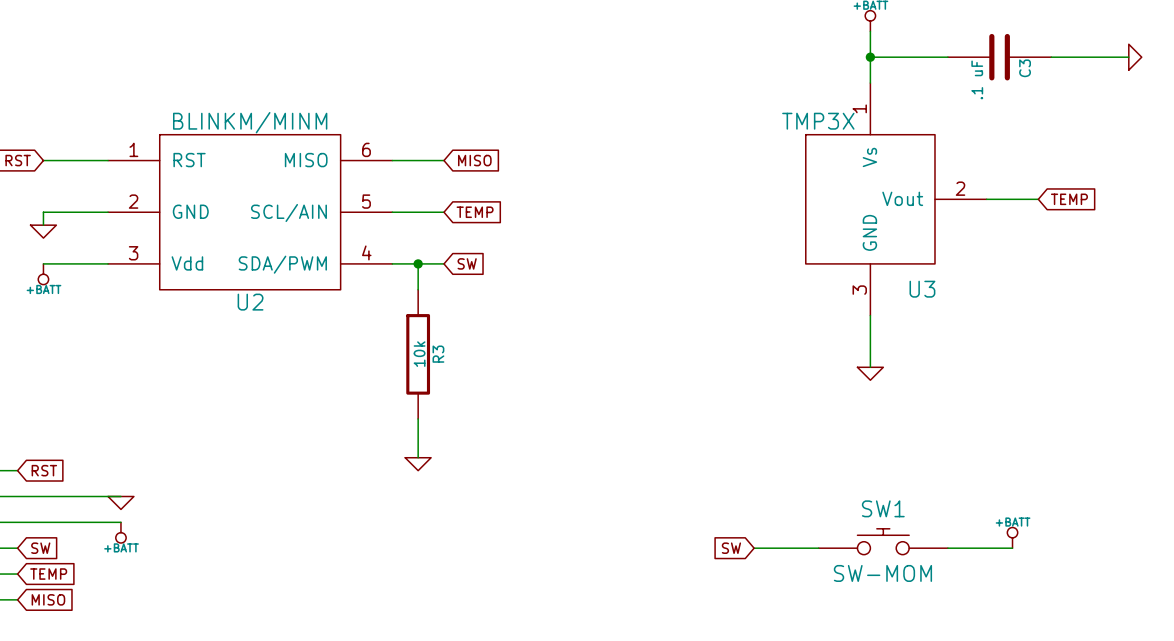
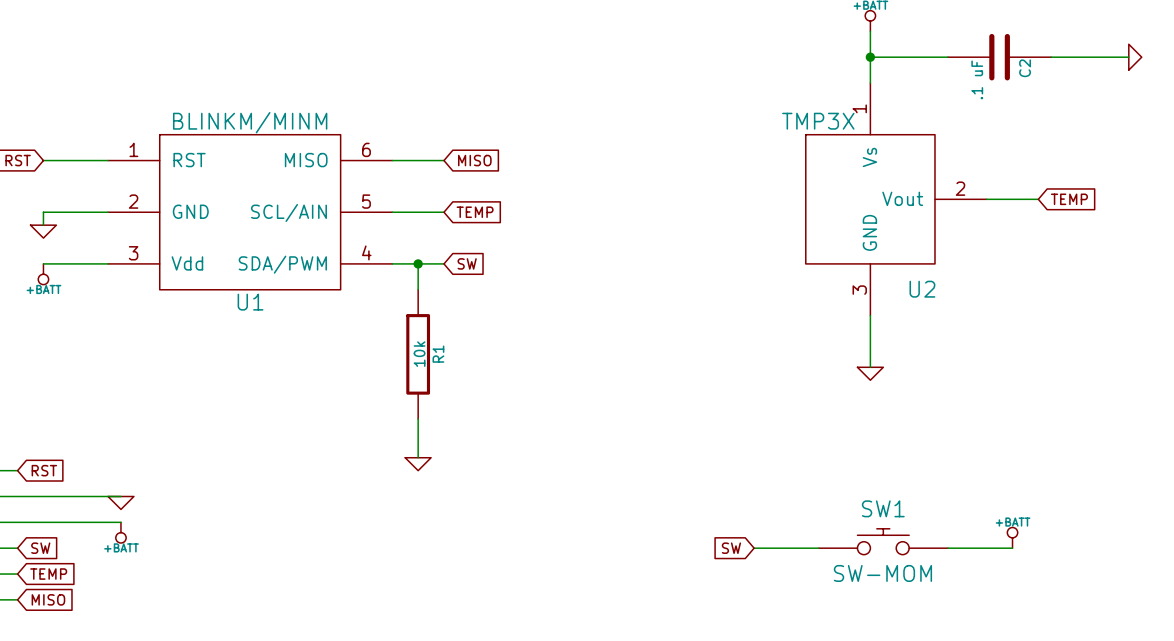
C3 name: C3 (1025, 68) -> C2 (1025, 68)
U3 name: U3 (922, 289) -> U2 (922, 289)
U2 name: U2 (250, 302) -> U1 (250, 302)
R3 name: R3 (438, 354) -> R1 (438, 354)

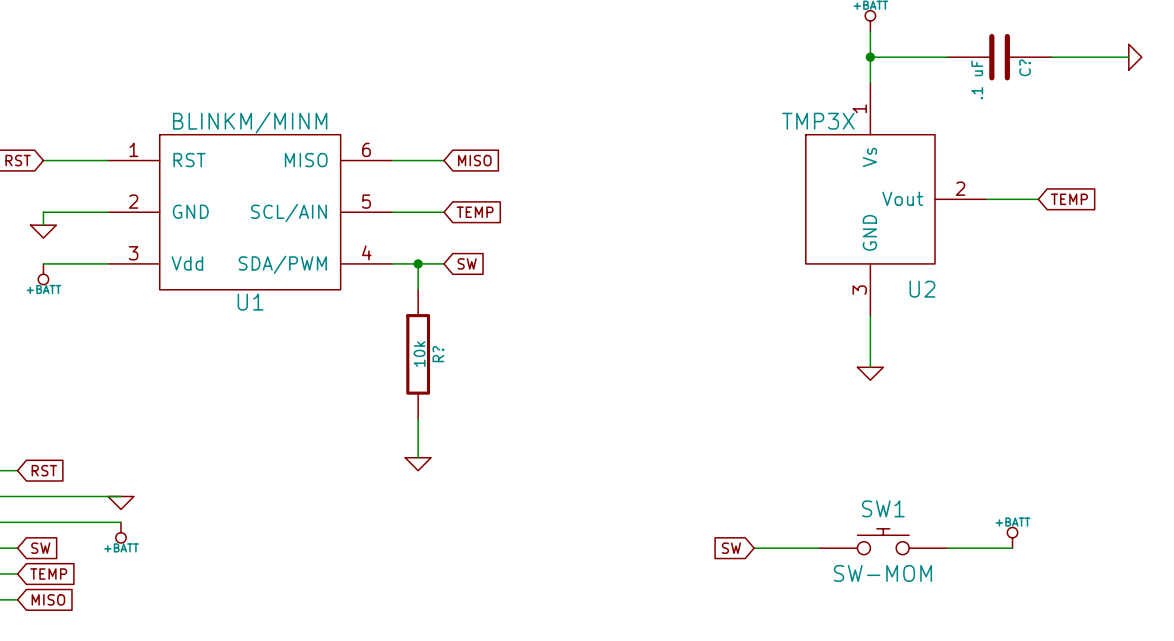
C2 name: C2 (1025, 68) -> C? (1025, 67)
R1 name: R1 (438, 354) -> R? (438, 354)

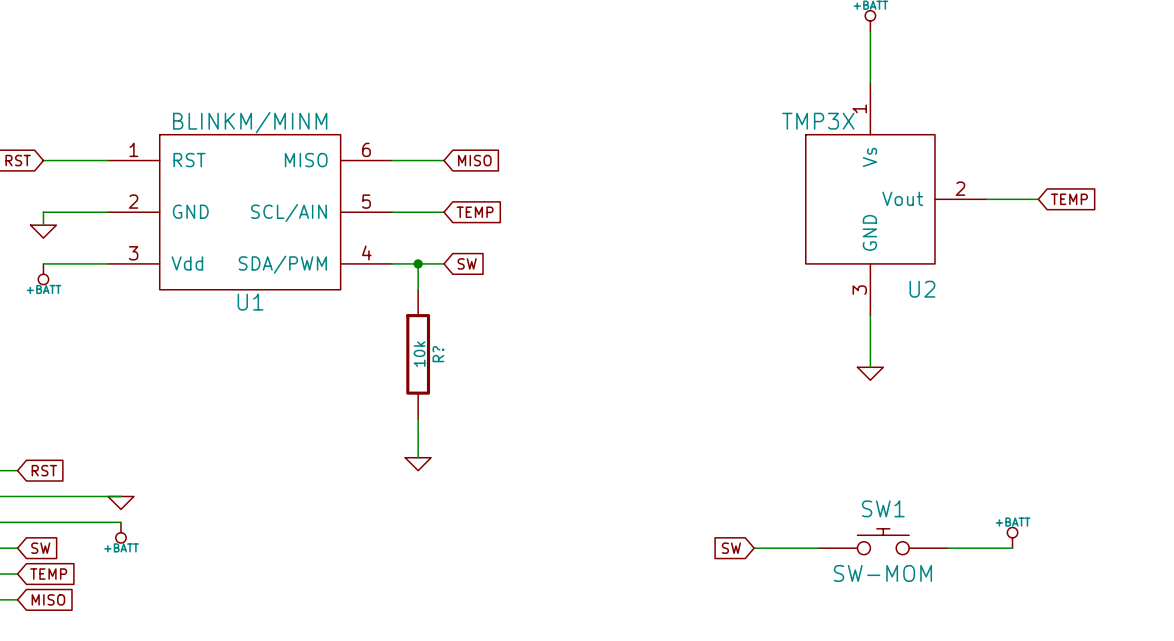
wire: (870, 57) (947, 57) -> none
junction: (870, 57) -> none
C?: .1 uF (999, 57) -> none
wire: (1051, 57) (1128, 57) -> none
power symbol: (1135, 57) -> none

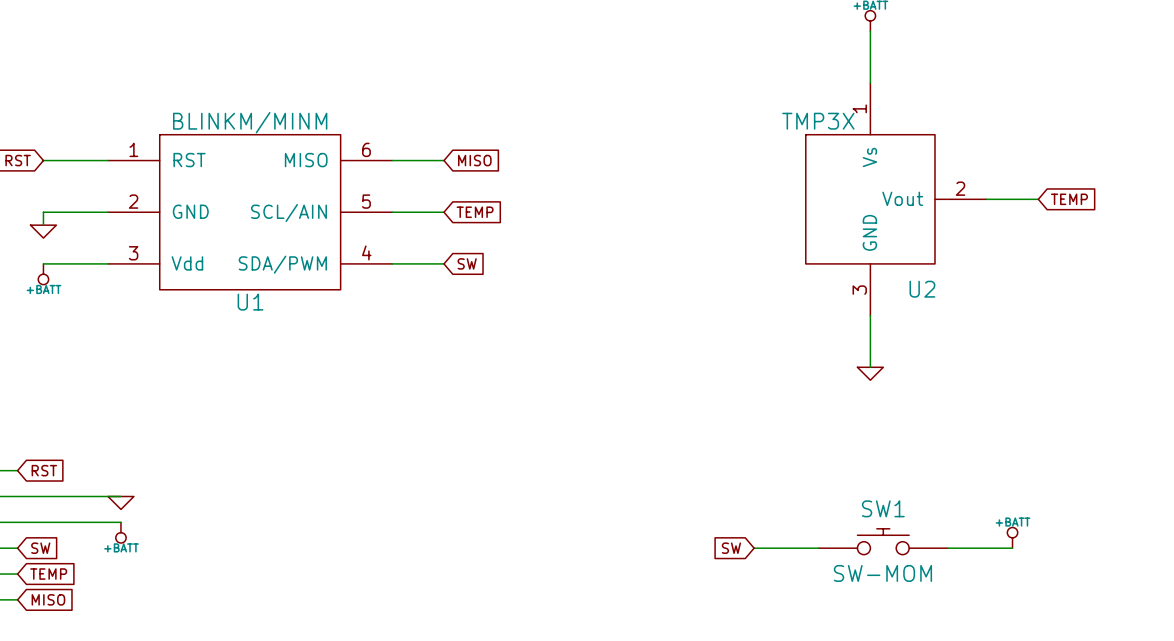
wire: (418, 263) (418, 289) -> none
junction: (418, 263) -> none
R?: 10k (418, 354) -> none
wire: (418, 418) (418, 457) -> none
power symbol: (418, 464) -> none

